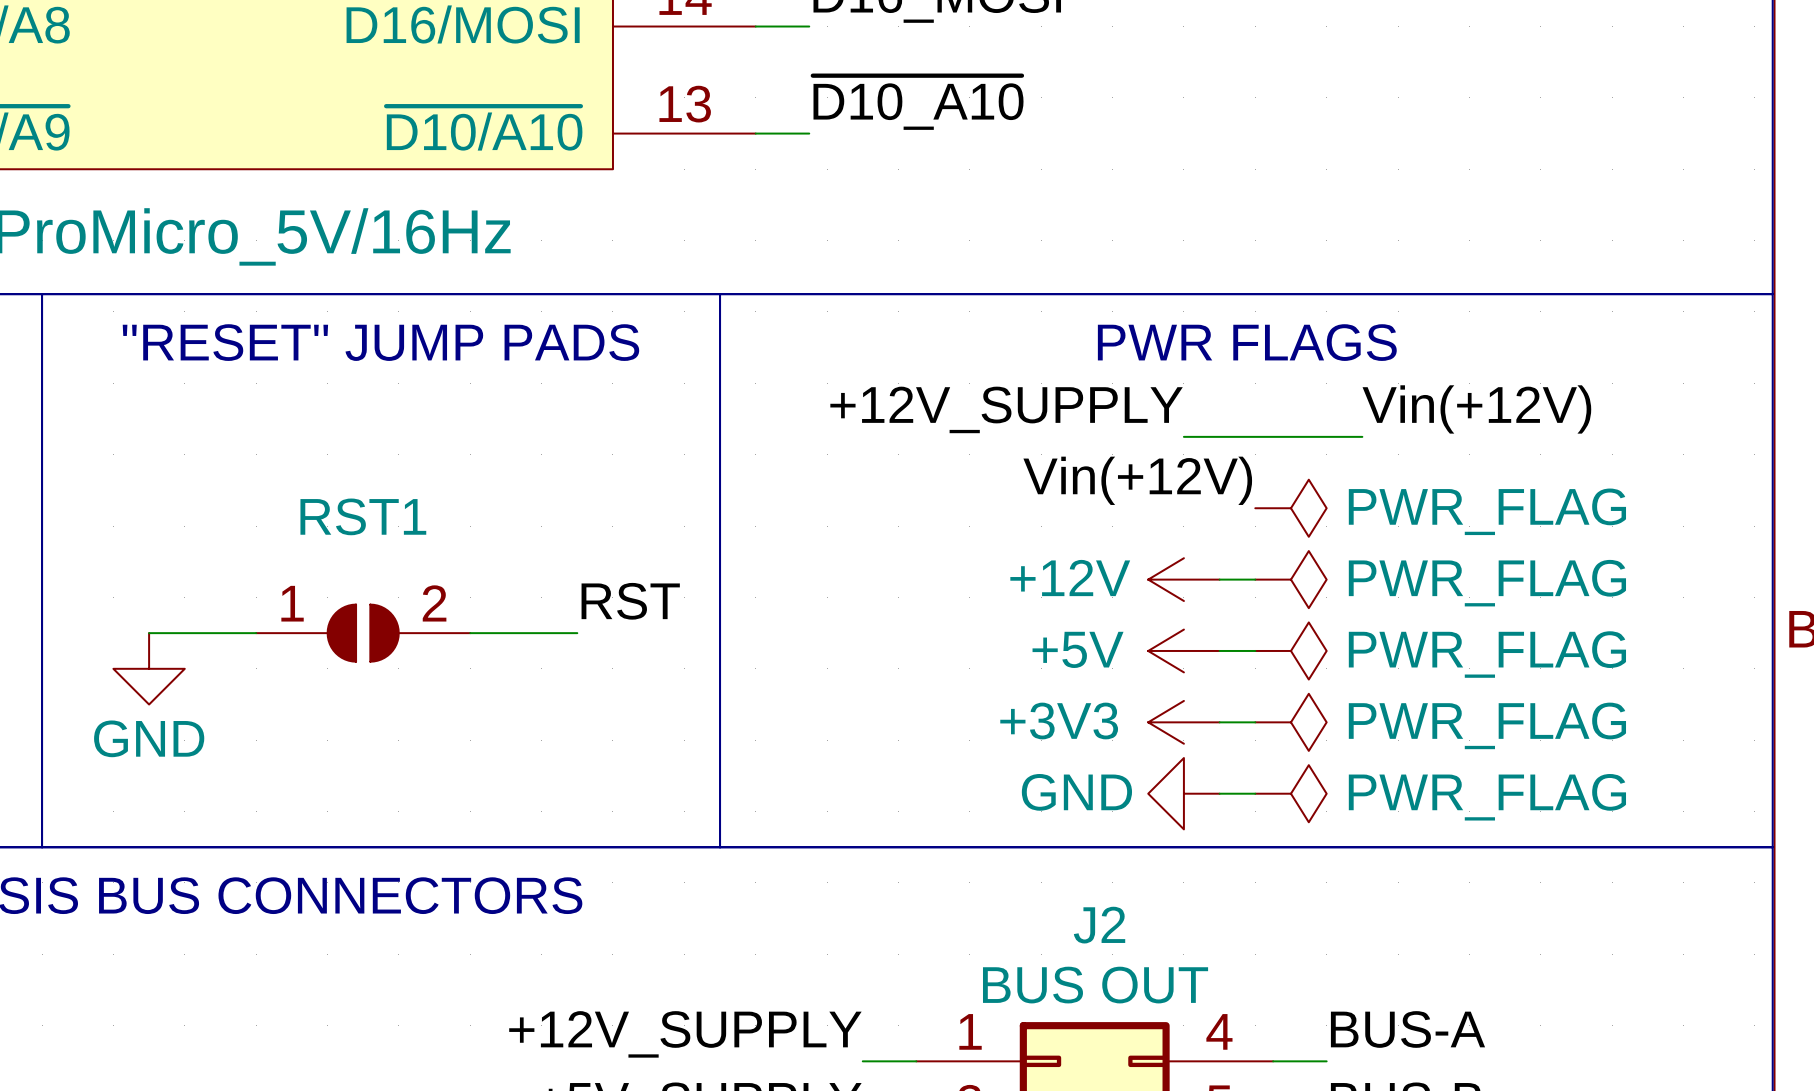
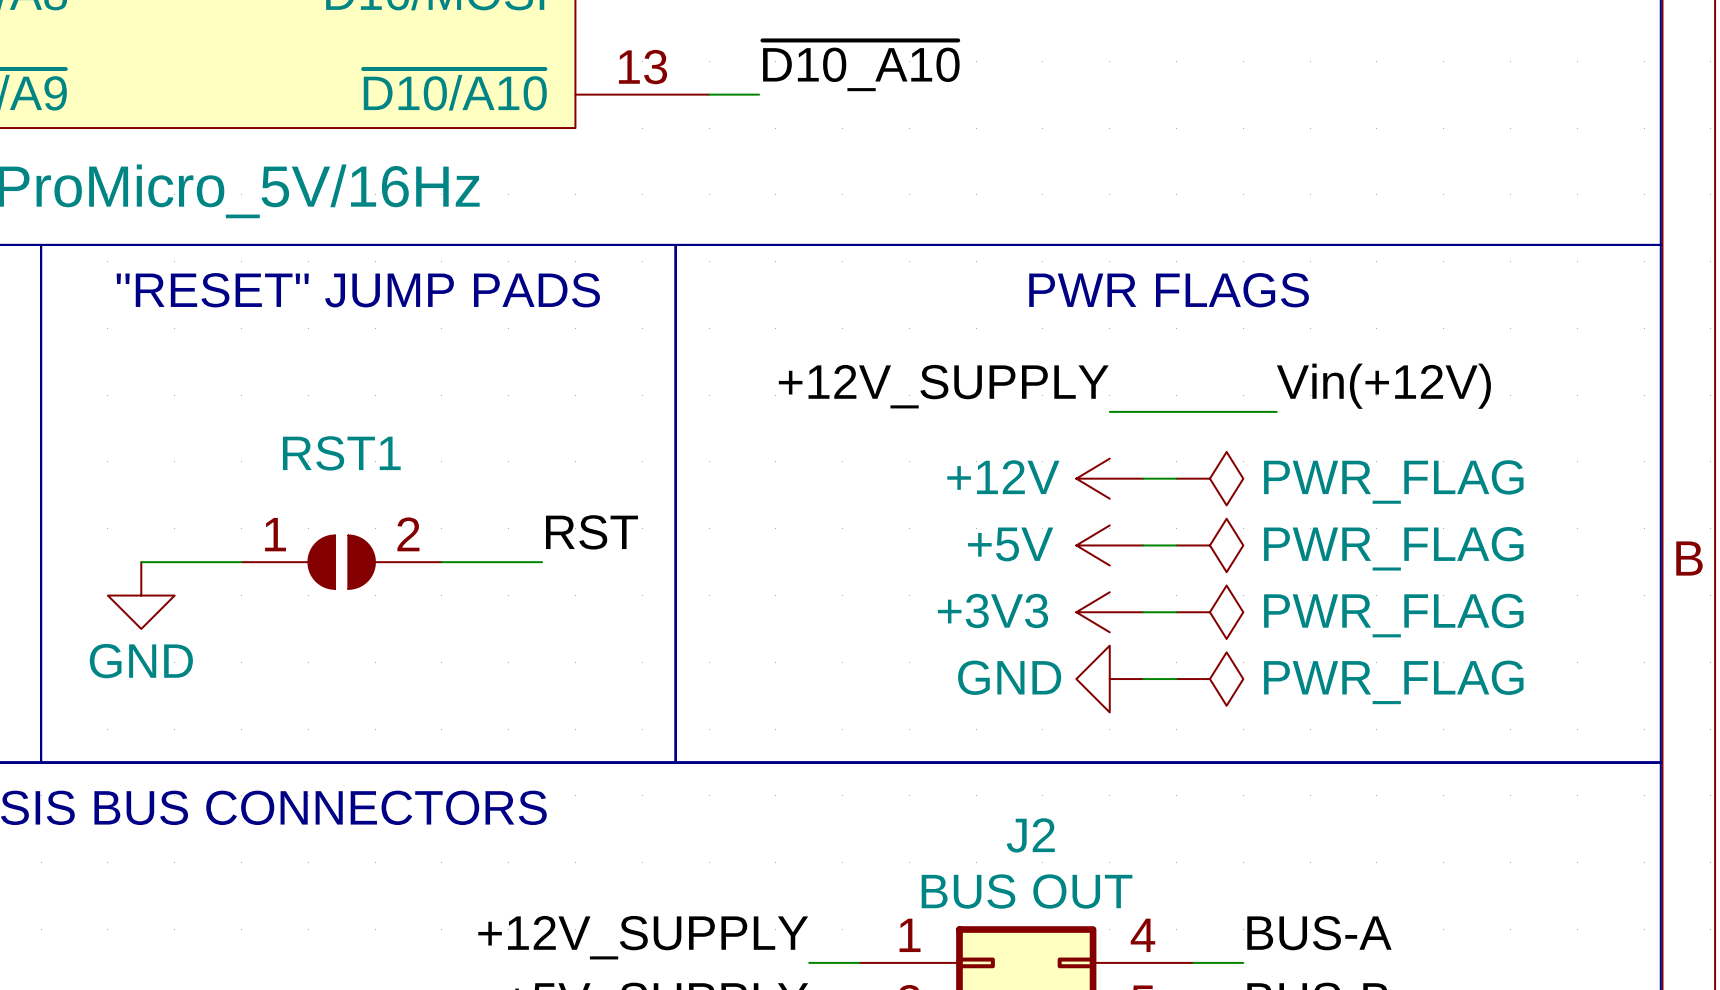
label position: +12V_SUPPLY (1006, 409) -> +12V_SUPPLY (943, 386)
label position: Vin(+12V) (1476, 409) -> Vin(+12V) (1383, 386)
wire: (1183, 436) (1362, 436) -> (1109, 411) (1276, 411)
label: Vin(+12V) (1137, 480) -> none
power symbol: PWR_FLAG (1290, 508) -> none
power symbol: none -> PWR_FLAG (1209, 478)
power symbol position: +12V (1183, 579) -> +12V (1109, 478)
wire: (1219, 579) (1255, 579) -> (1143, 478) (1176, 478)
power symbol: PWR_FLAG (1290, 579) -> none
power symbol: none -> PWR_FLAG (1209, 545)
power symbol position: +5V (1183, 650) -> +5V (1109, 545)
wire: (1219, 650) (1255, 650) -> (1143, 545) (1176, 545)
power symbol: PWR_FLAG (1290, 650) -> none
power symbol: none -> PWR_FLAG (1209, 612)
power symbol position: +3V3 (1183, 722) -> +3V3 (1109, 612)
wire: (1219, 722) (1255, 722) -> (1143, 612) (1176, 612)
power symbol: PWR_FLAG (1290, 722) -> none
power symbol: none -> PWR_FLAG (1209, 679)
power symbol position: GND (1183, 793) -> GND (1109, 679)
wire: (1219, 793) (1255, 793) -> (1143, 679) (1176, 679)
power symbol: PWR_FLAG (1290, 793) -> none

